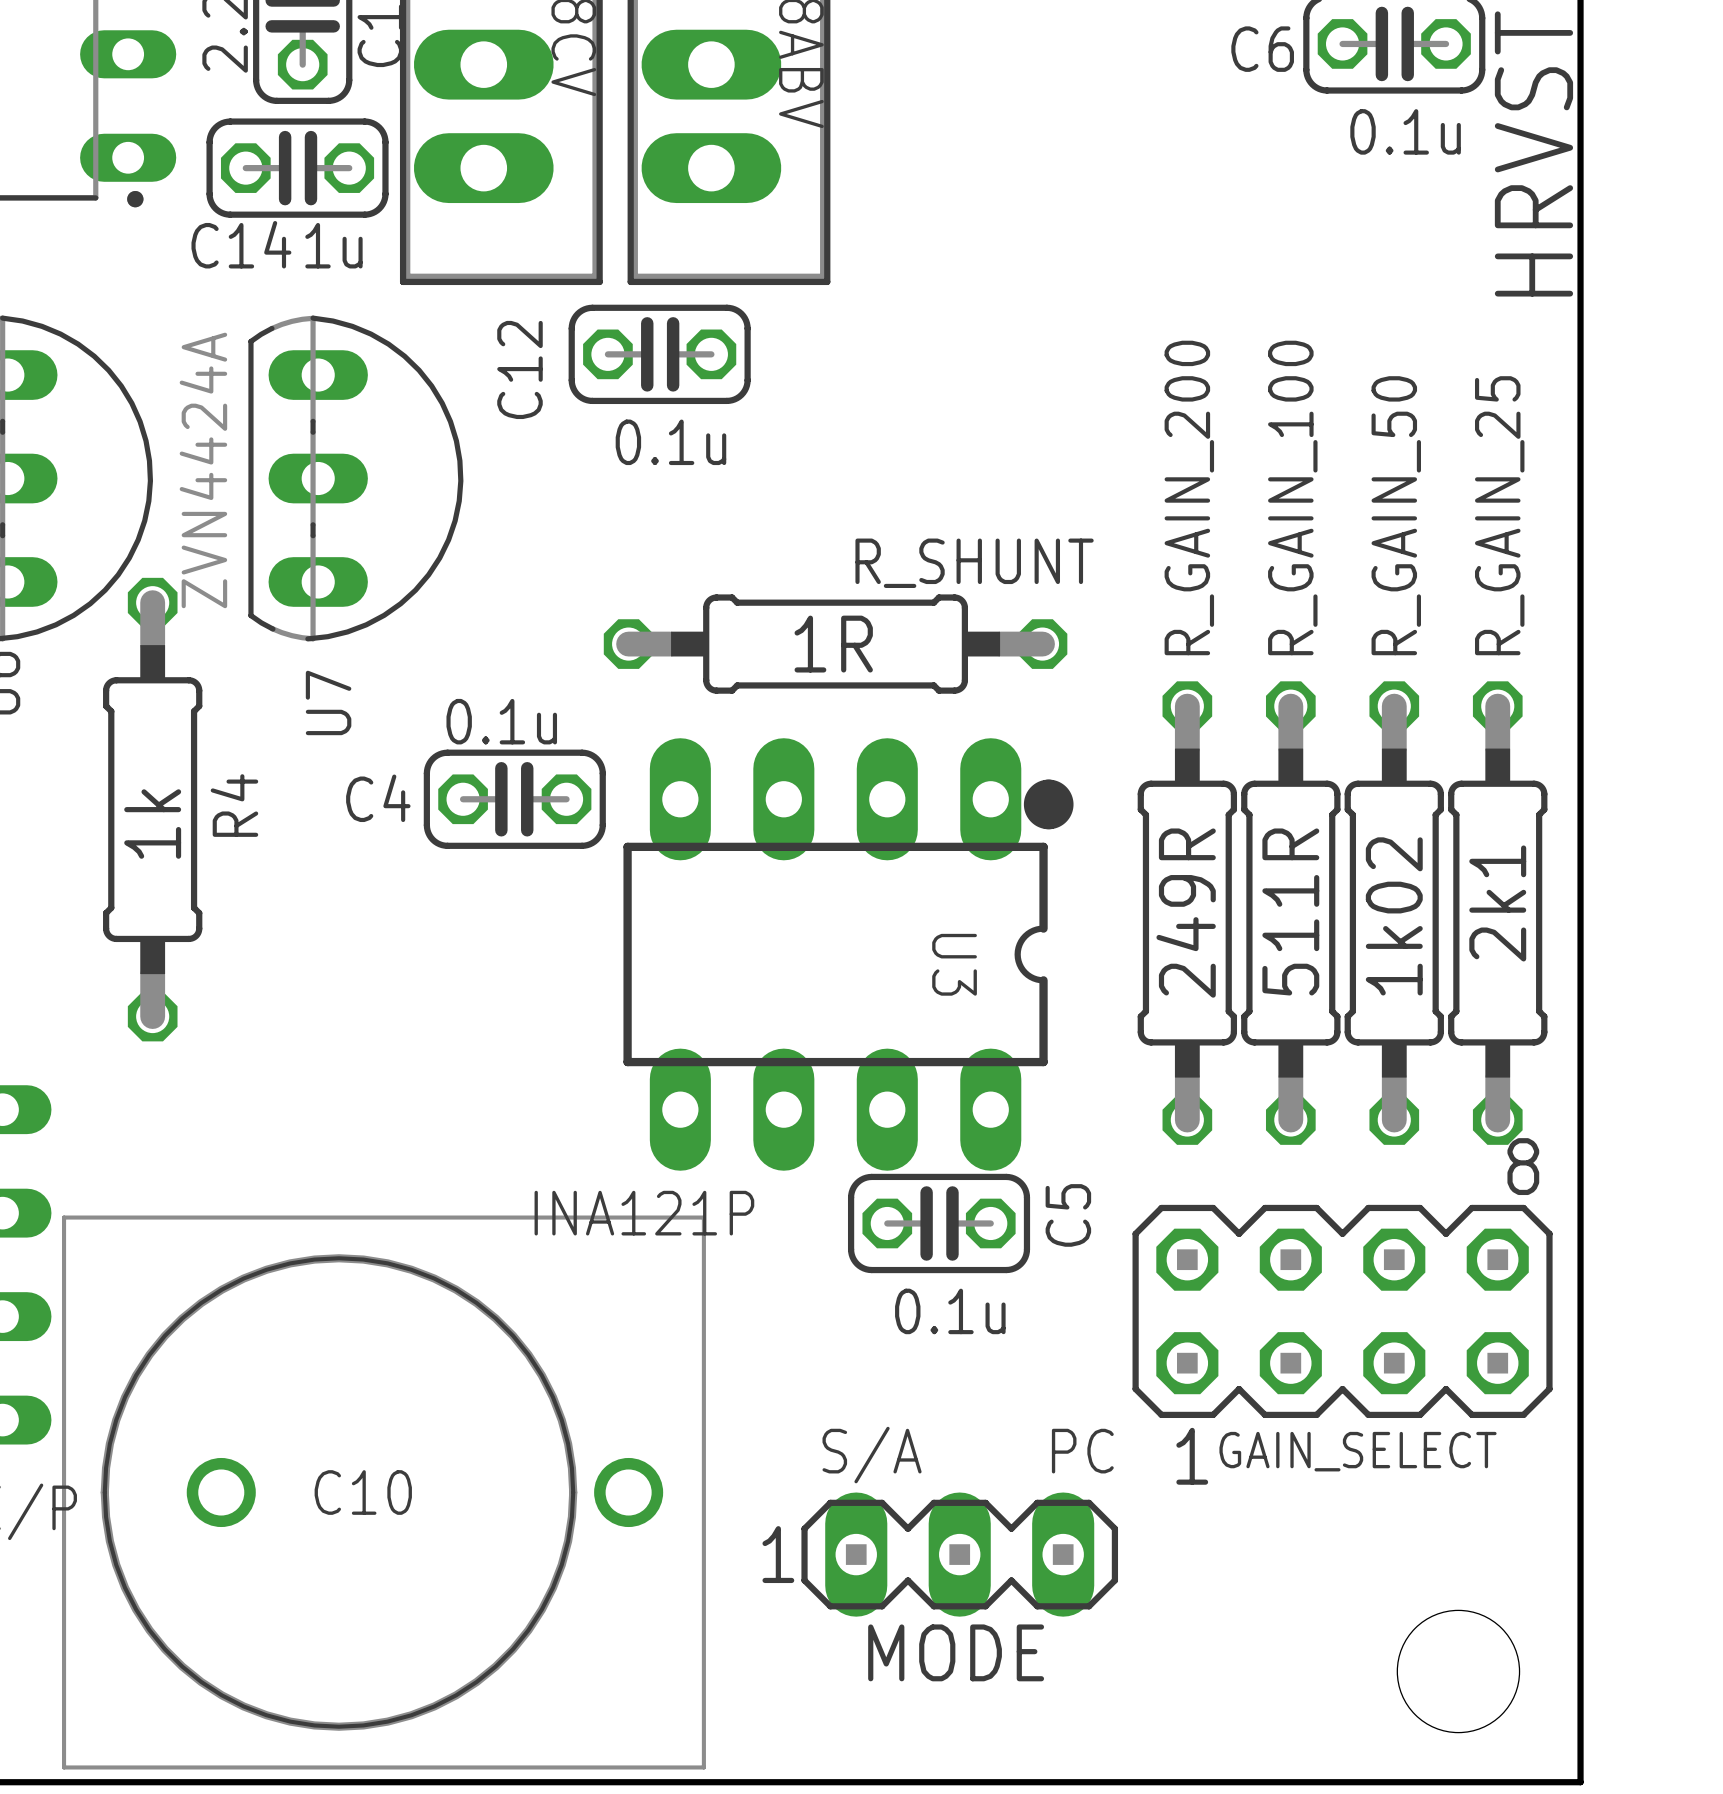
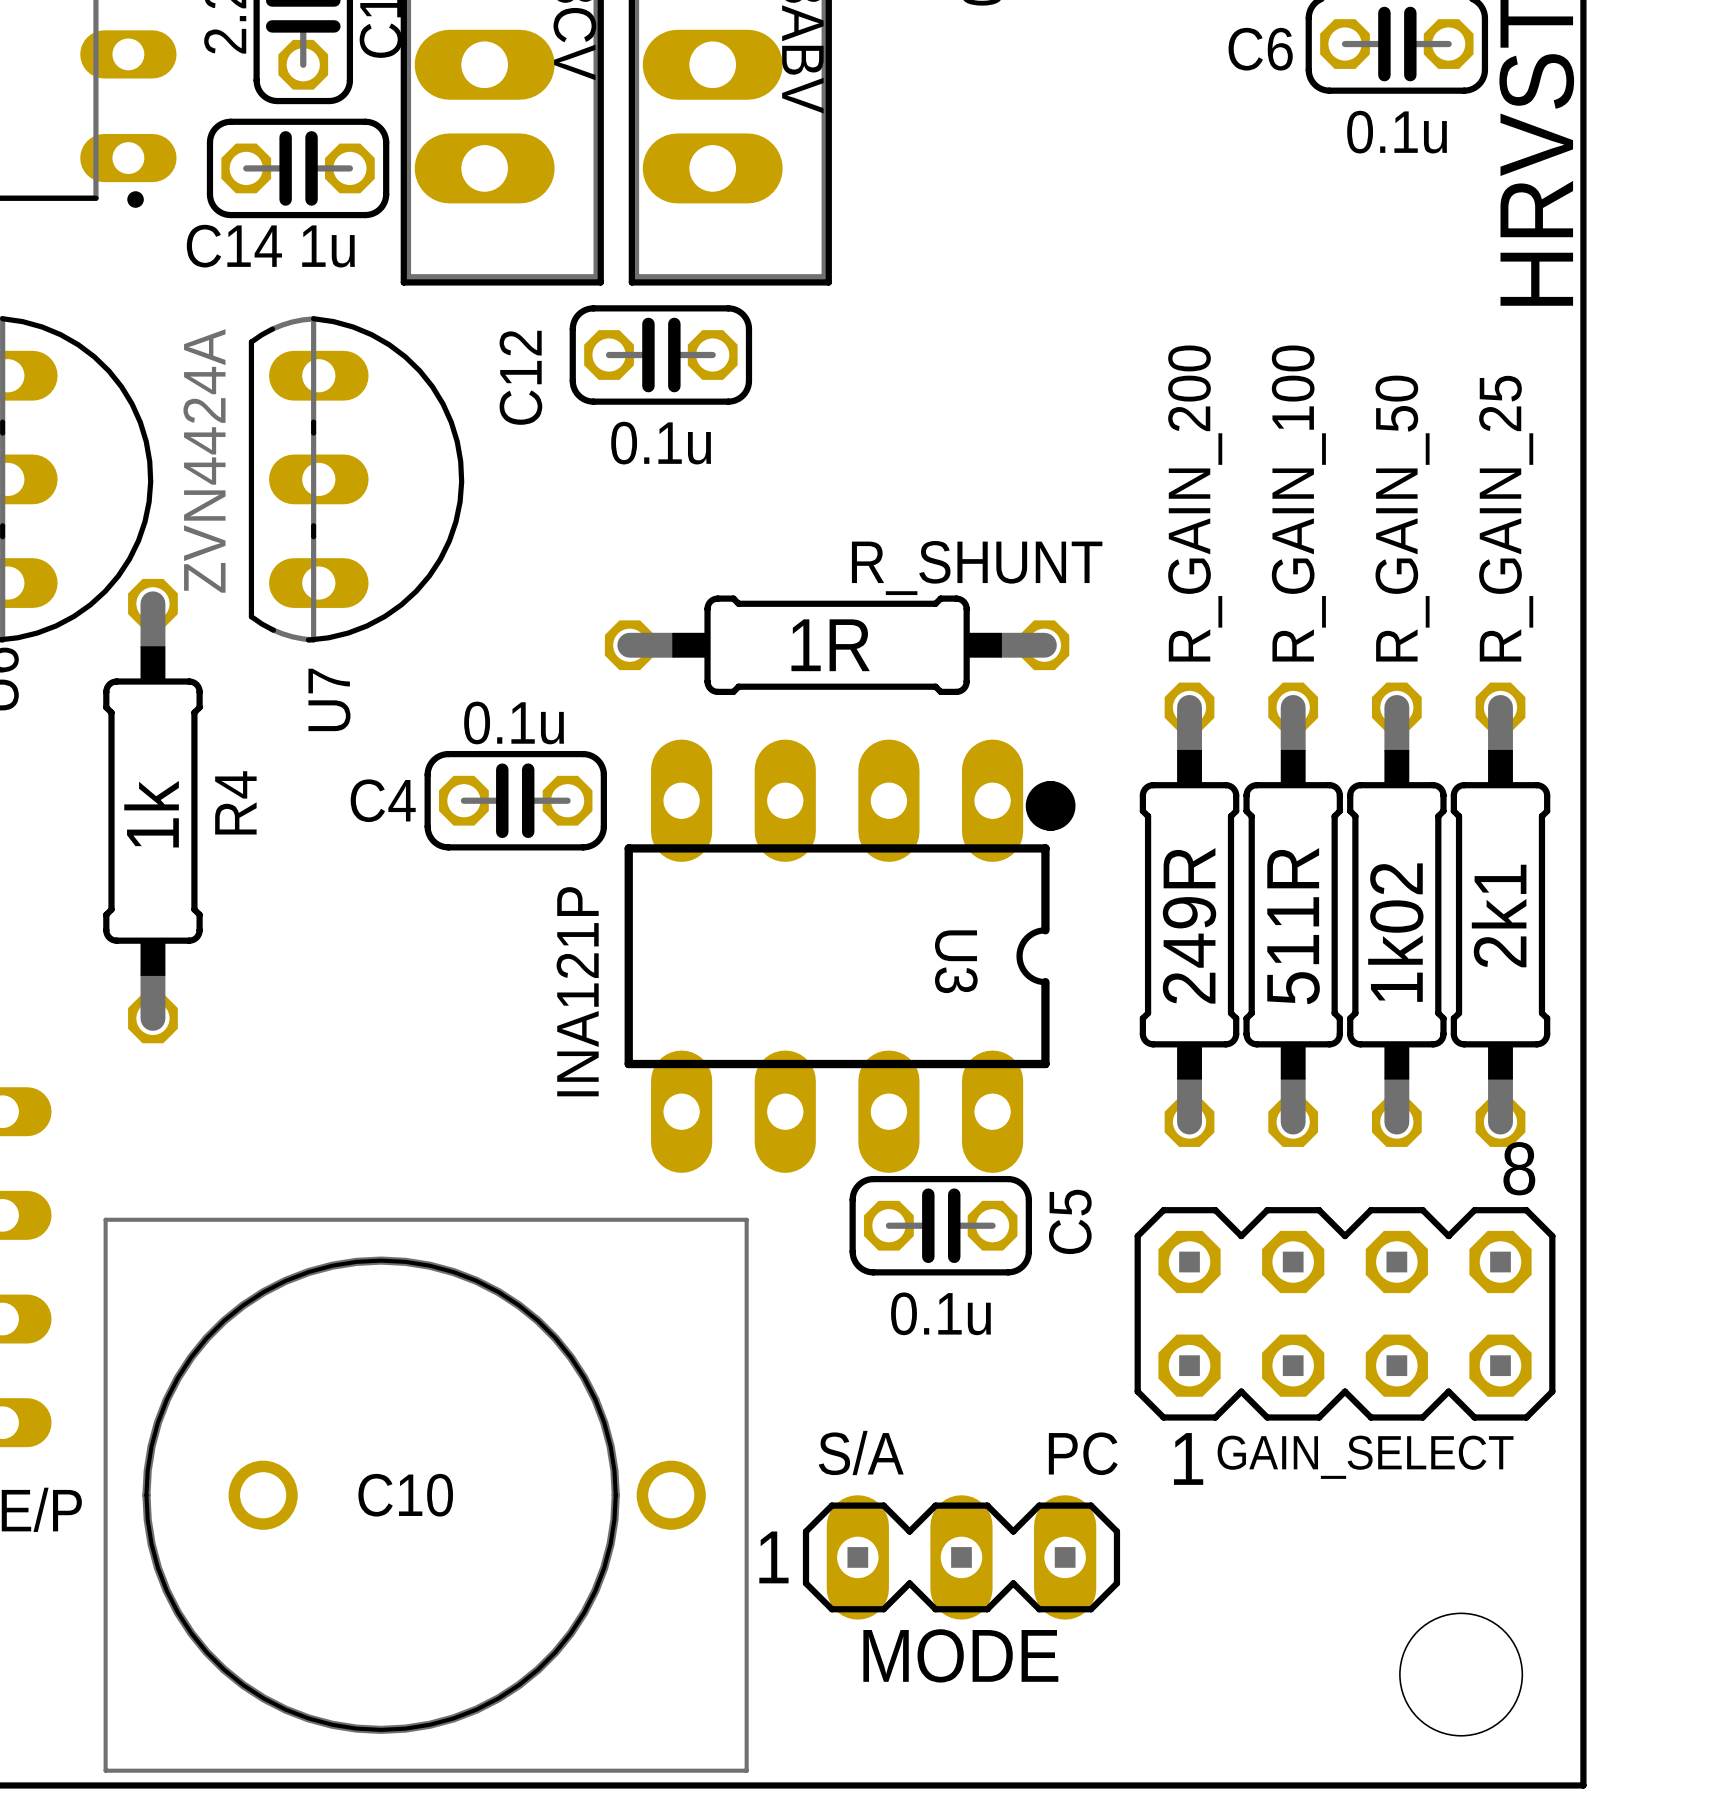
text rotation: 0° (644, 1213) -> 90° counterclockwise (577, 991)
C10 position: (383, 1492) -> (426, 1495)

